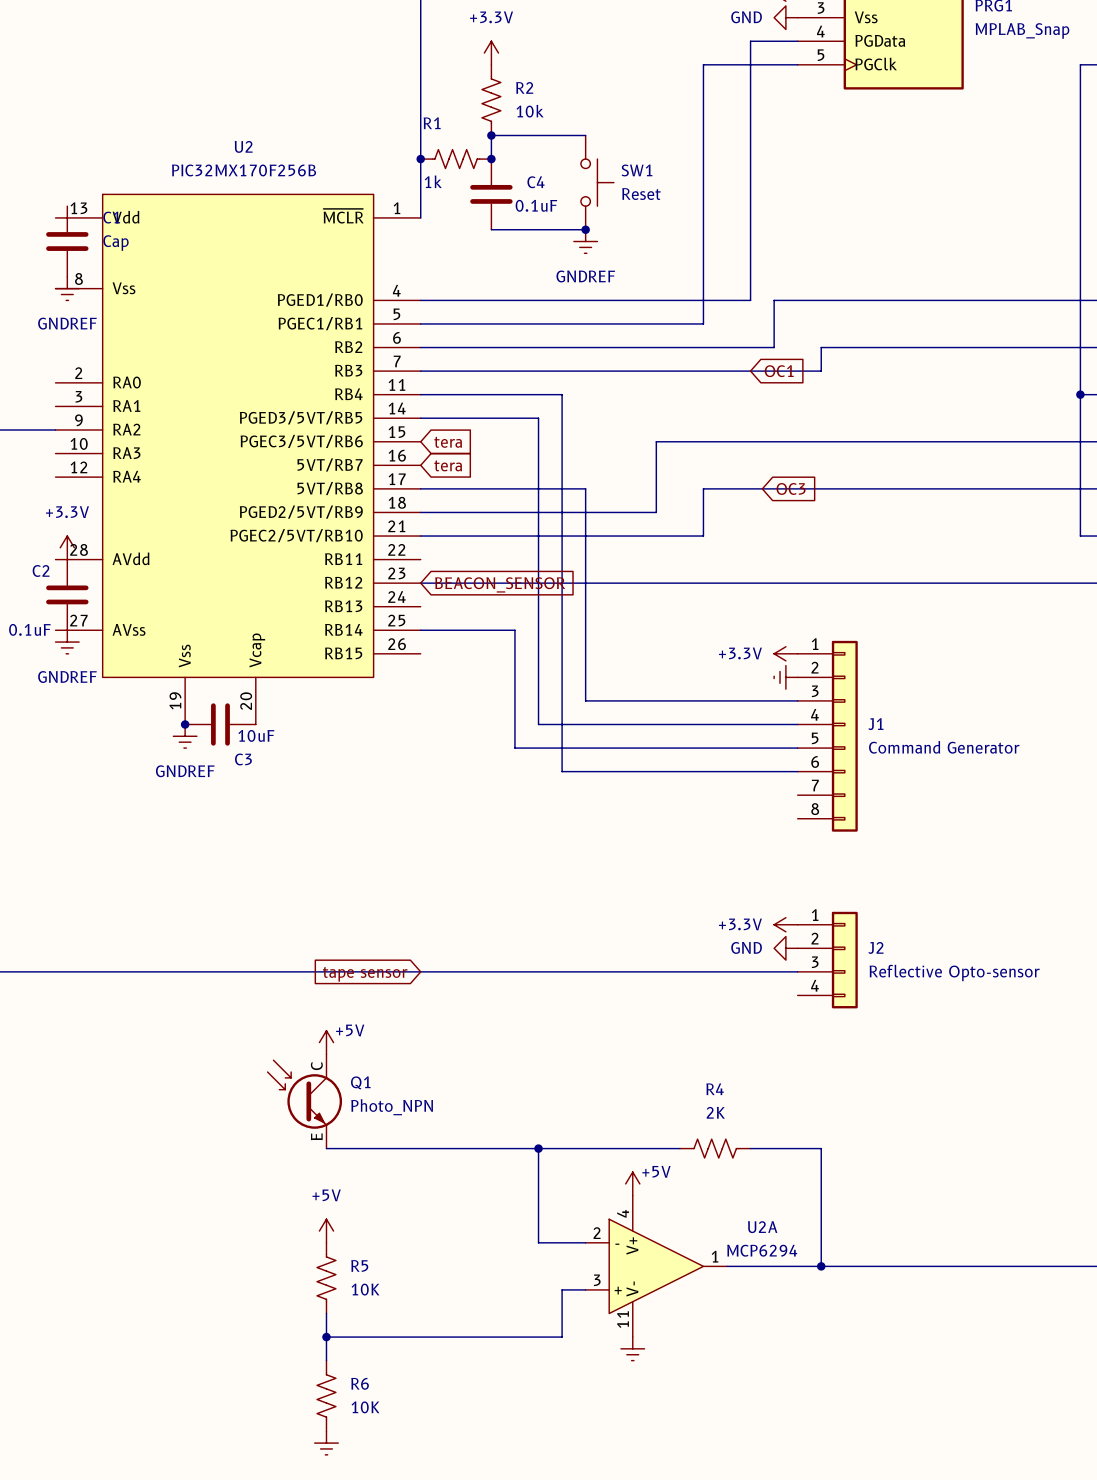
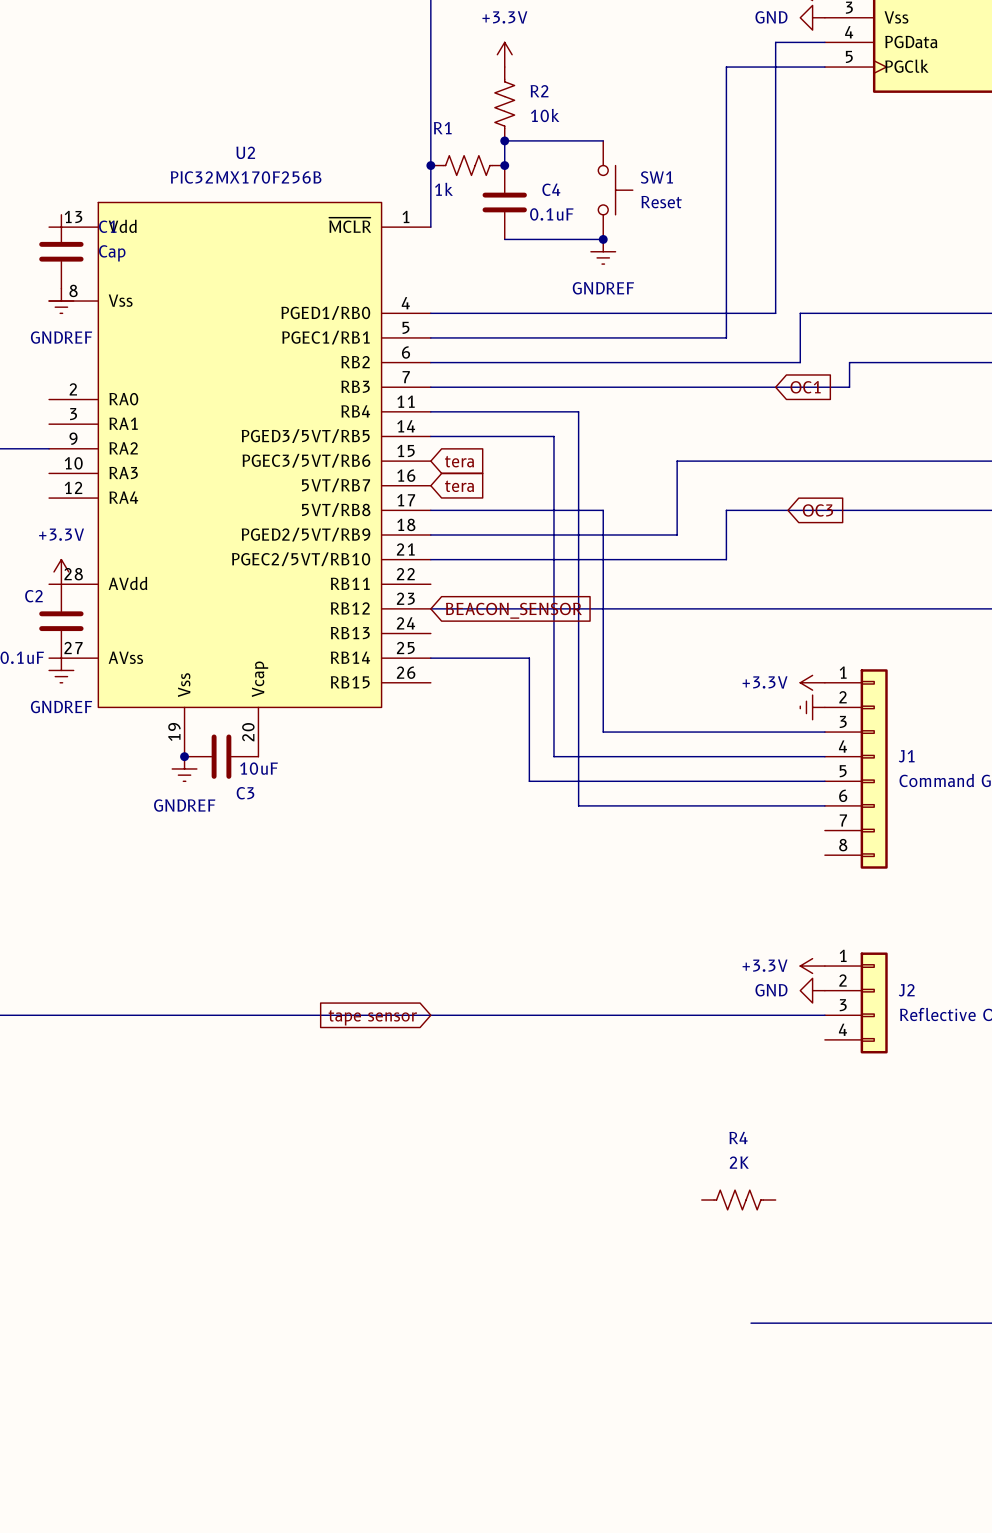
power symbol: +5V (326, 1042) -> none
Q1: Photo_NPN (304, 1101) -> none
wire: (326, 1148) (679, 1148) -> none
wire: (538, 1148) (538, 1242) (585, 1242) -> none
junction: (538, 1148) -> none
wire: (750, 1148) (821, 1148) (821, 1266) -> none
power symbol: +5V (632, 1183) -> none
power symbol: +5V (326, 1231) -> none
U2A: MCP6294 (656, 1266) -> none
junction: (821, 1266) -> none
R5: 10K (326, 1278) -> none
wire: (585, 1289) (562, 1289) (562, 1337) (326, 1337) -> none
wire: (326, 1313) (326, 1360) -> none
junction: (326, 1337) -> none
power symbol: (632, 1348) -> none
R6: 10K (326, 1395) -> none
power symbol: (326, 1443) -> none

